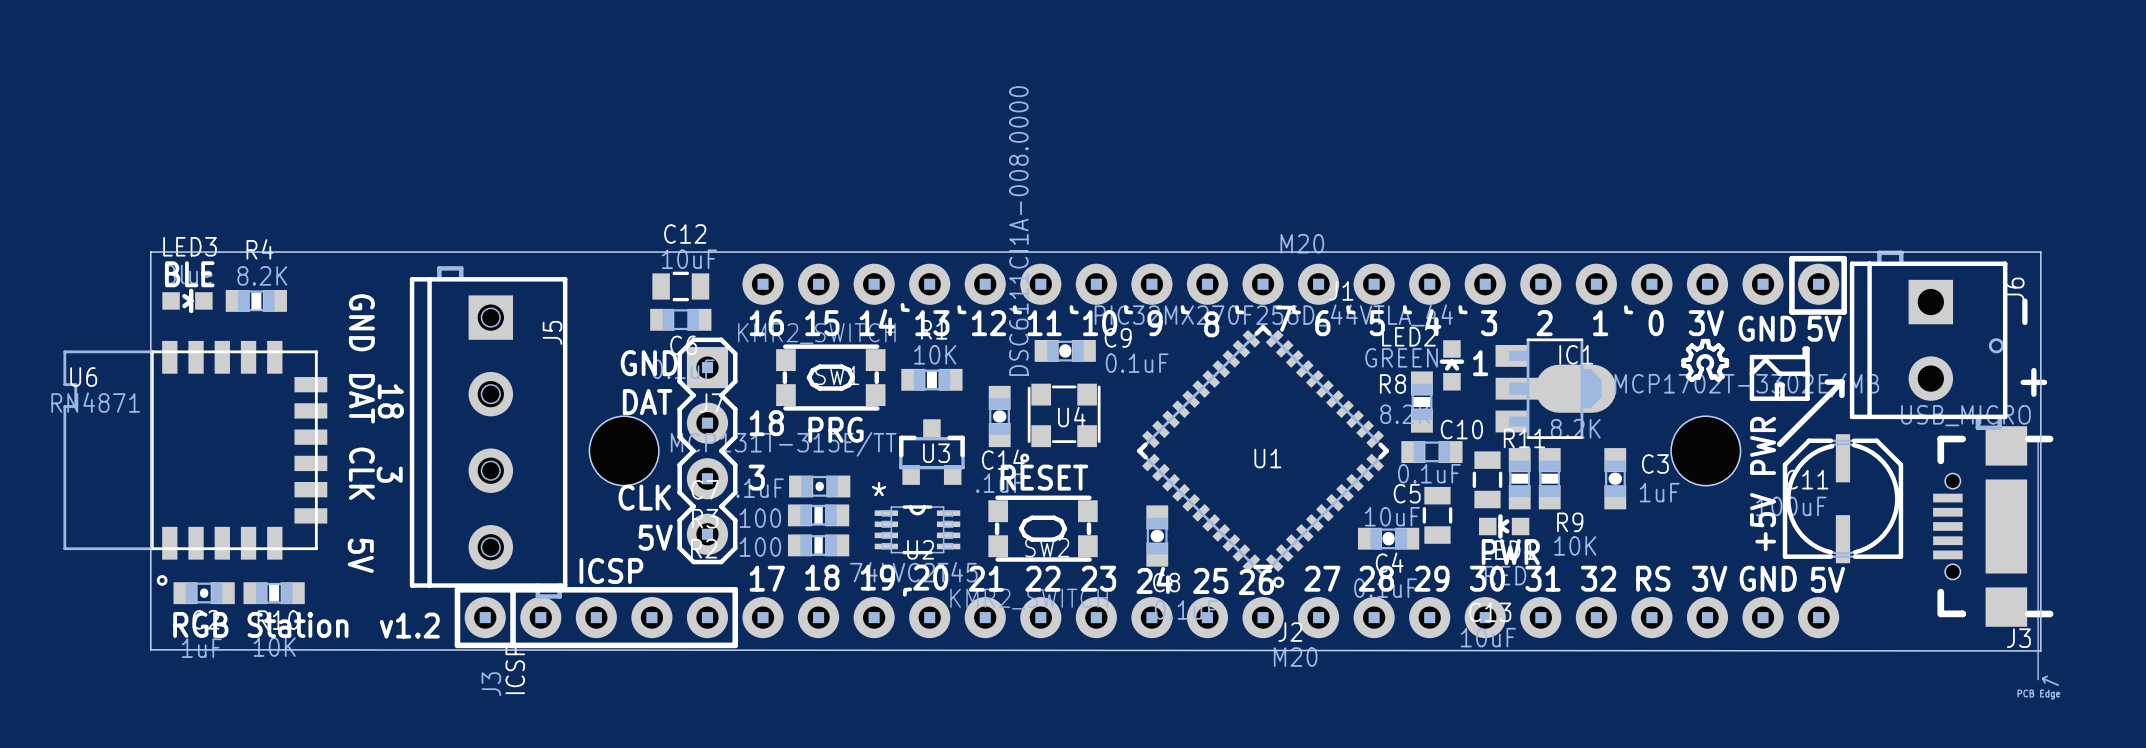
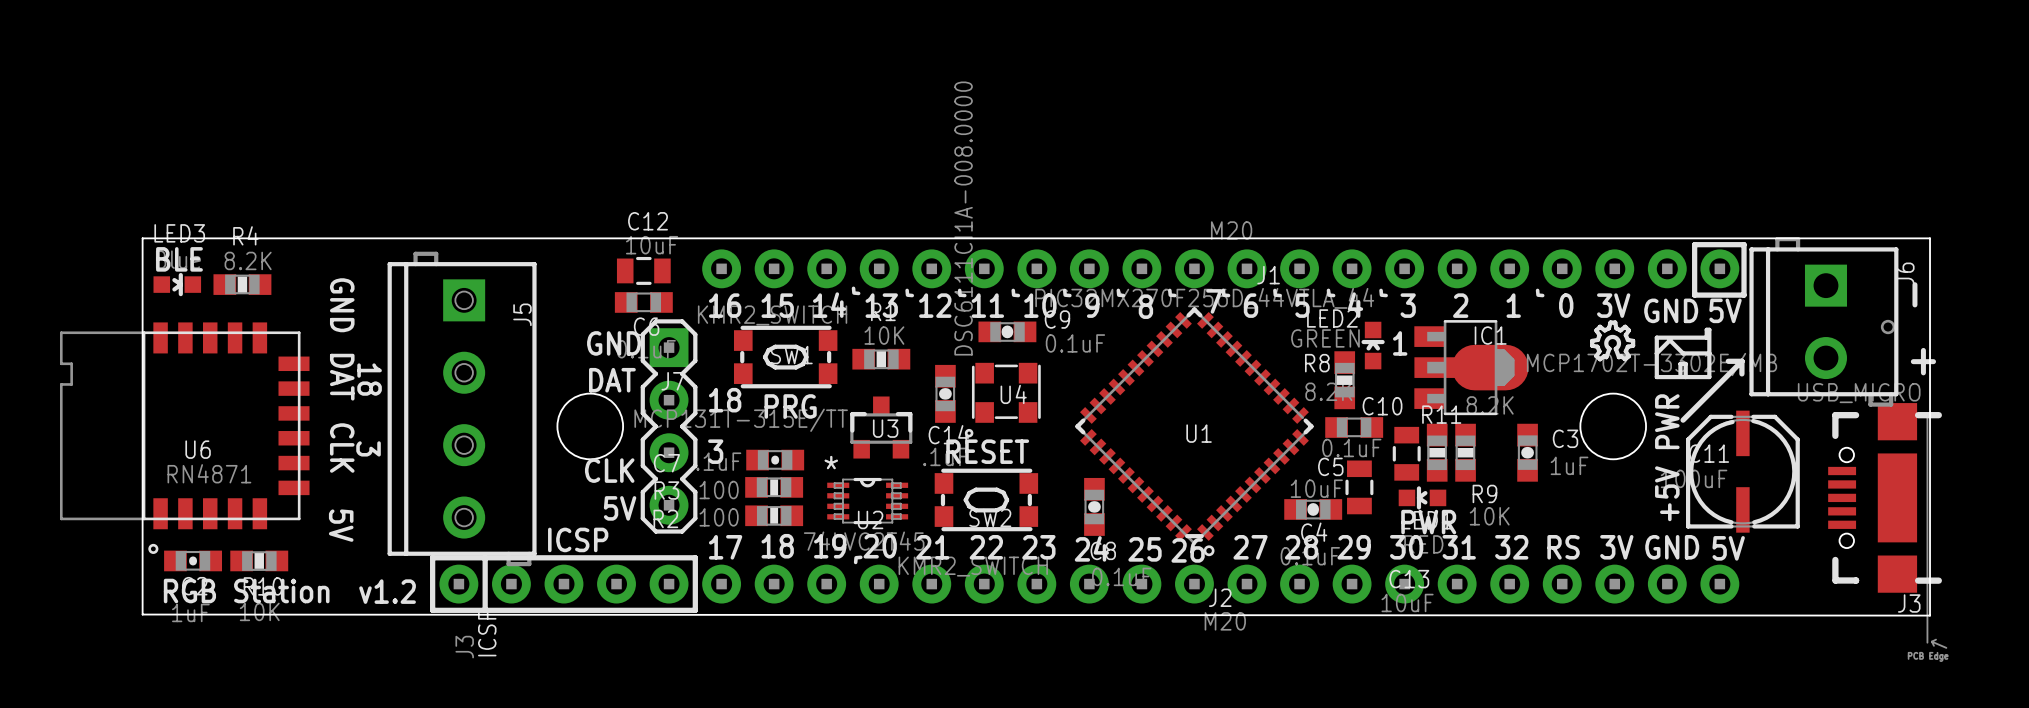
U6 name position: U6 (83, 377) -> U6 (198, 449)
U6 value position: RN4871 (95, 402) -> RN4871 (209, 473)

